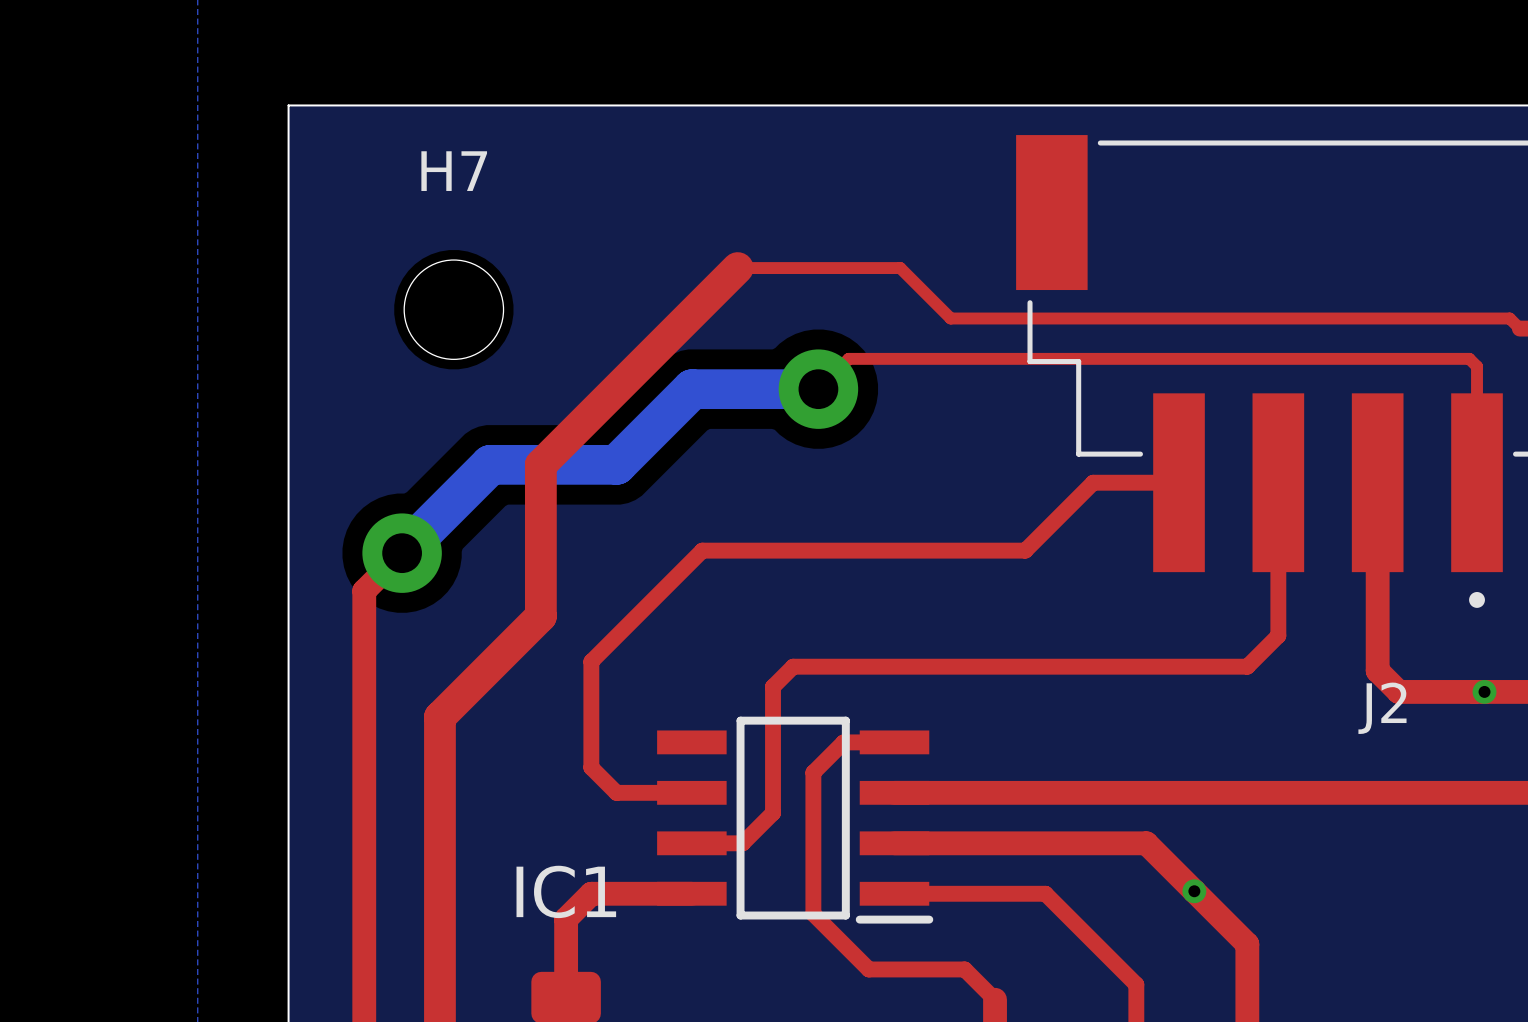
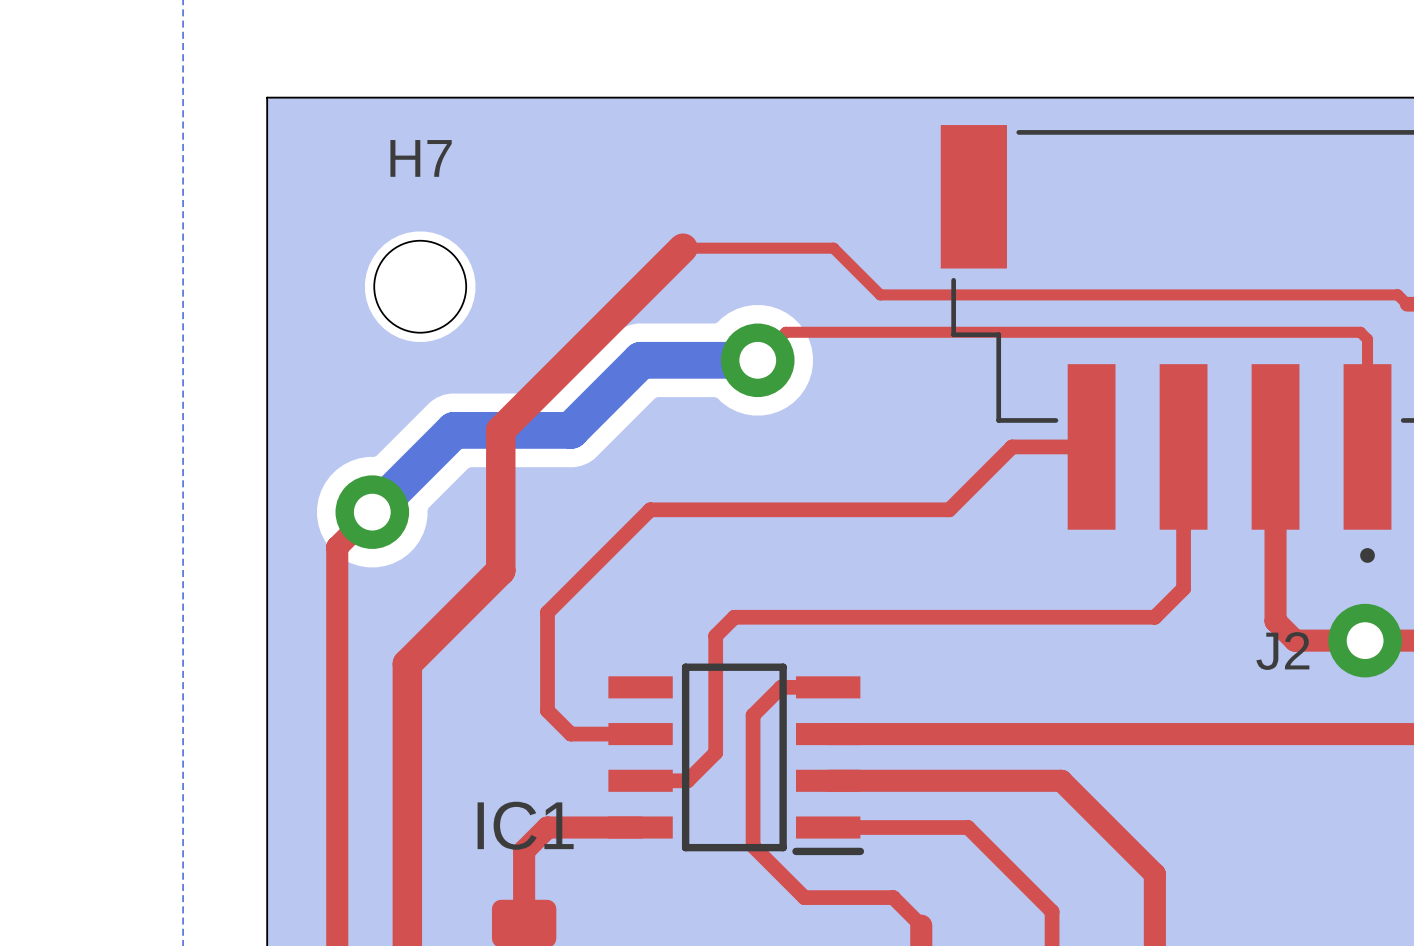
via size: [1472, 680, 1497, 704] -> [1328, 603, 1402, 678]
via: (1194, 891) -> none

